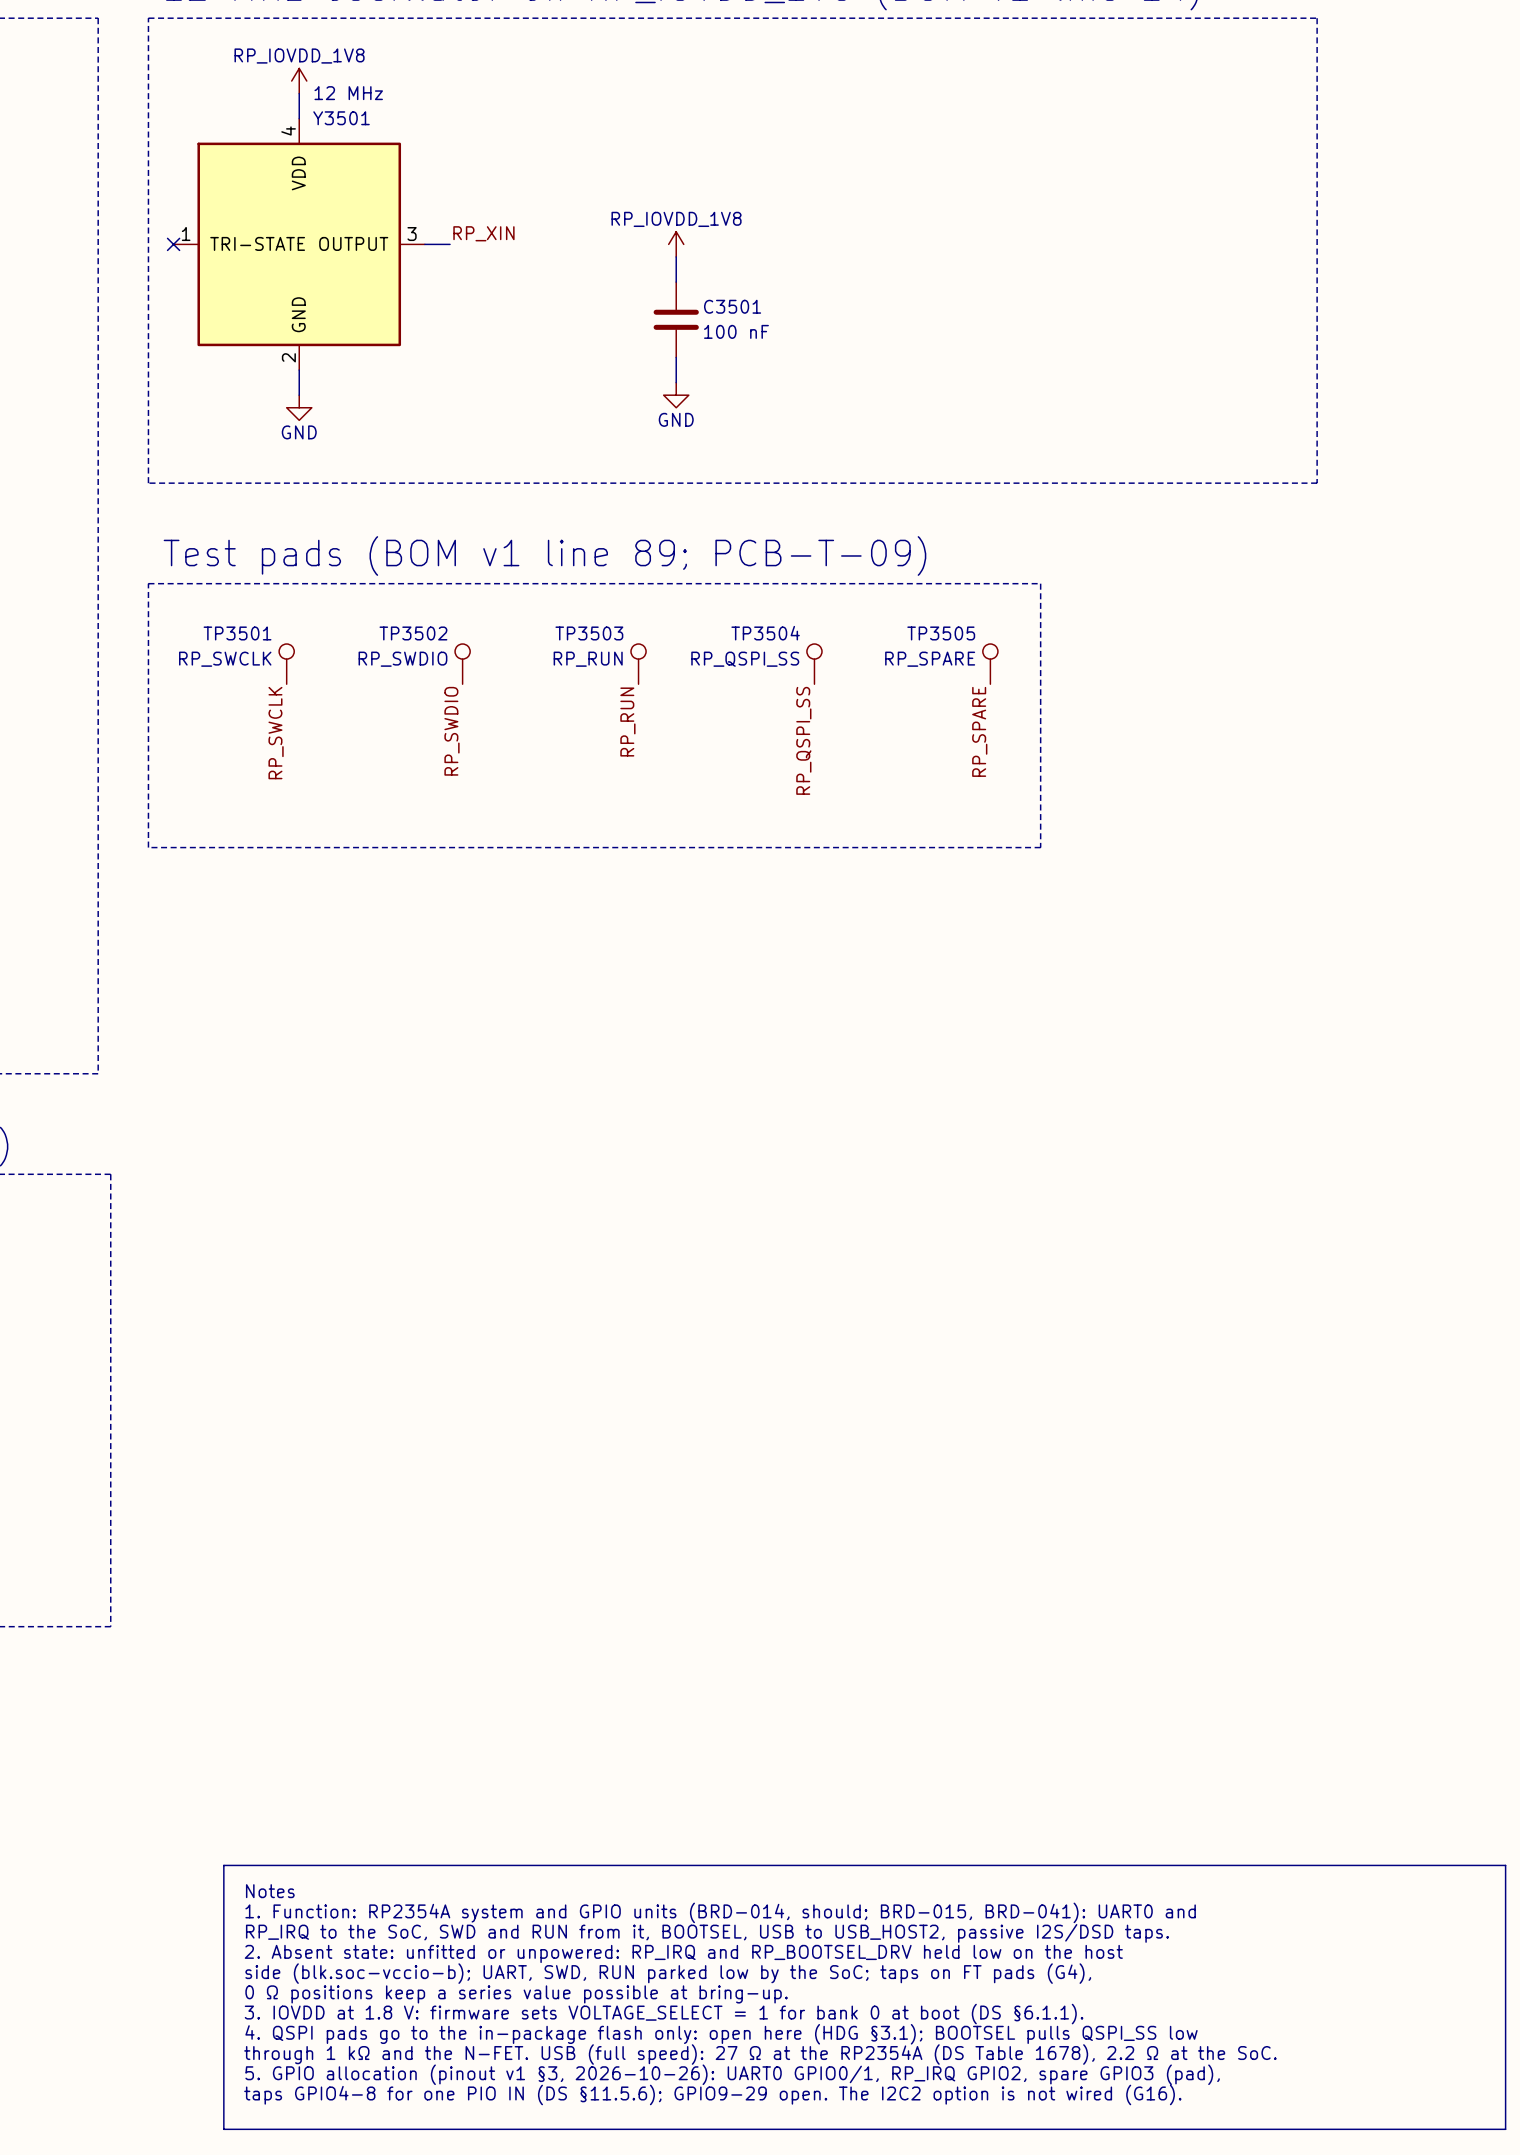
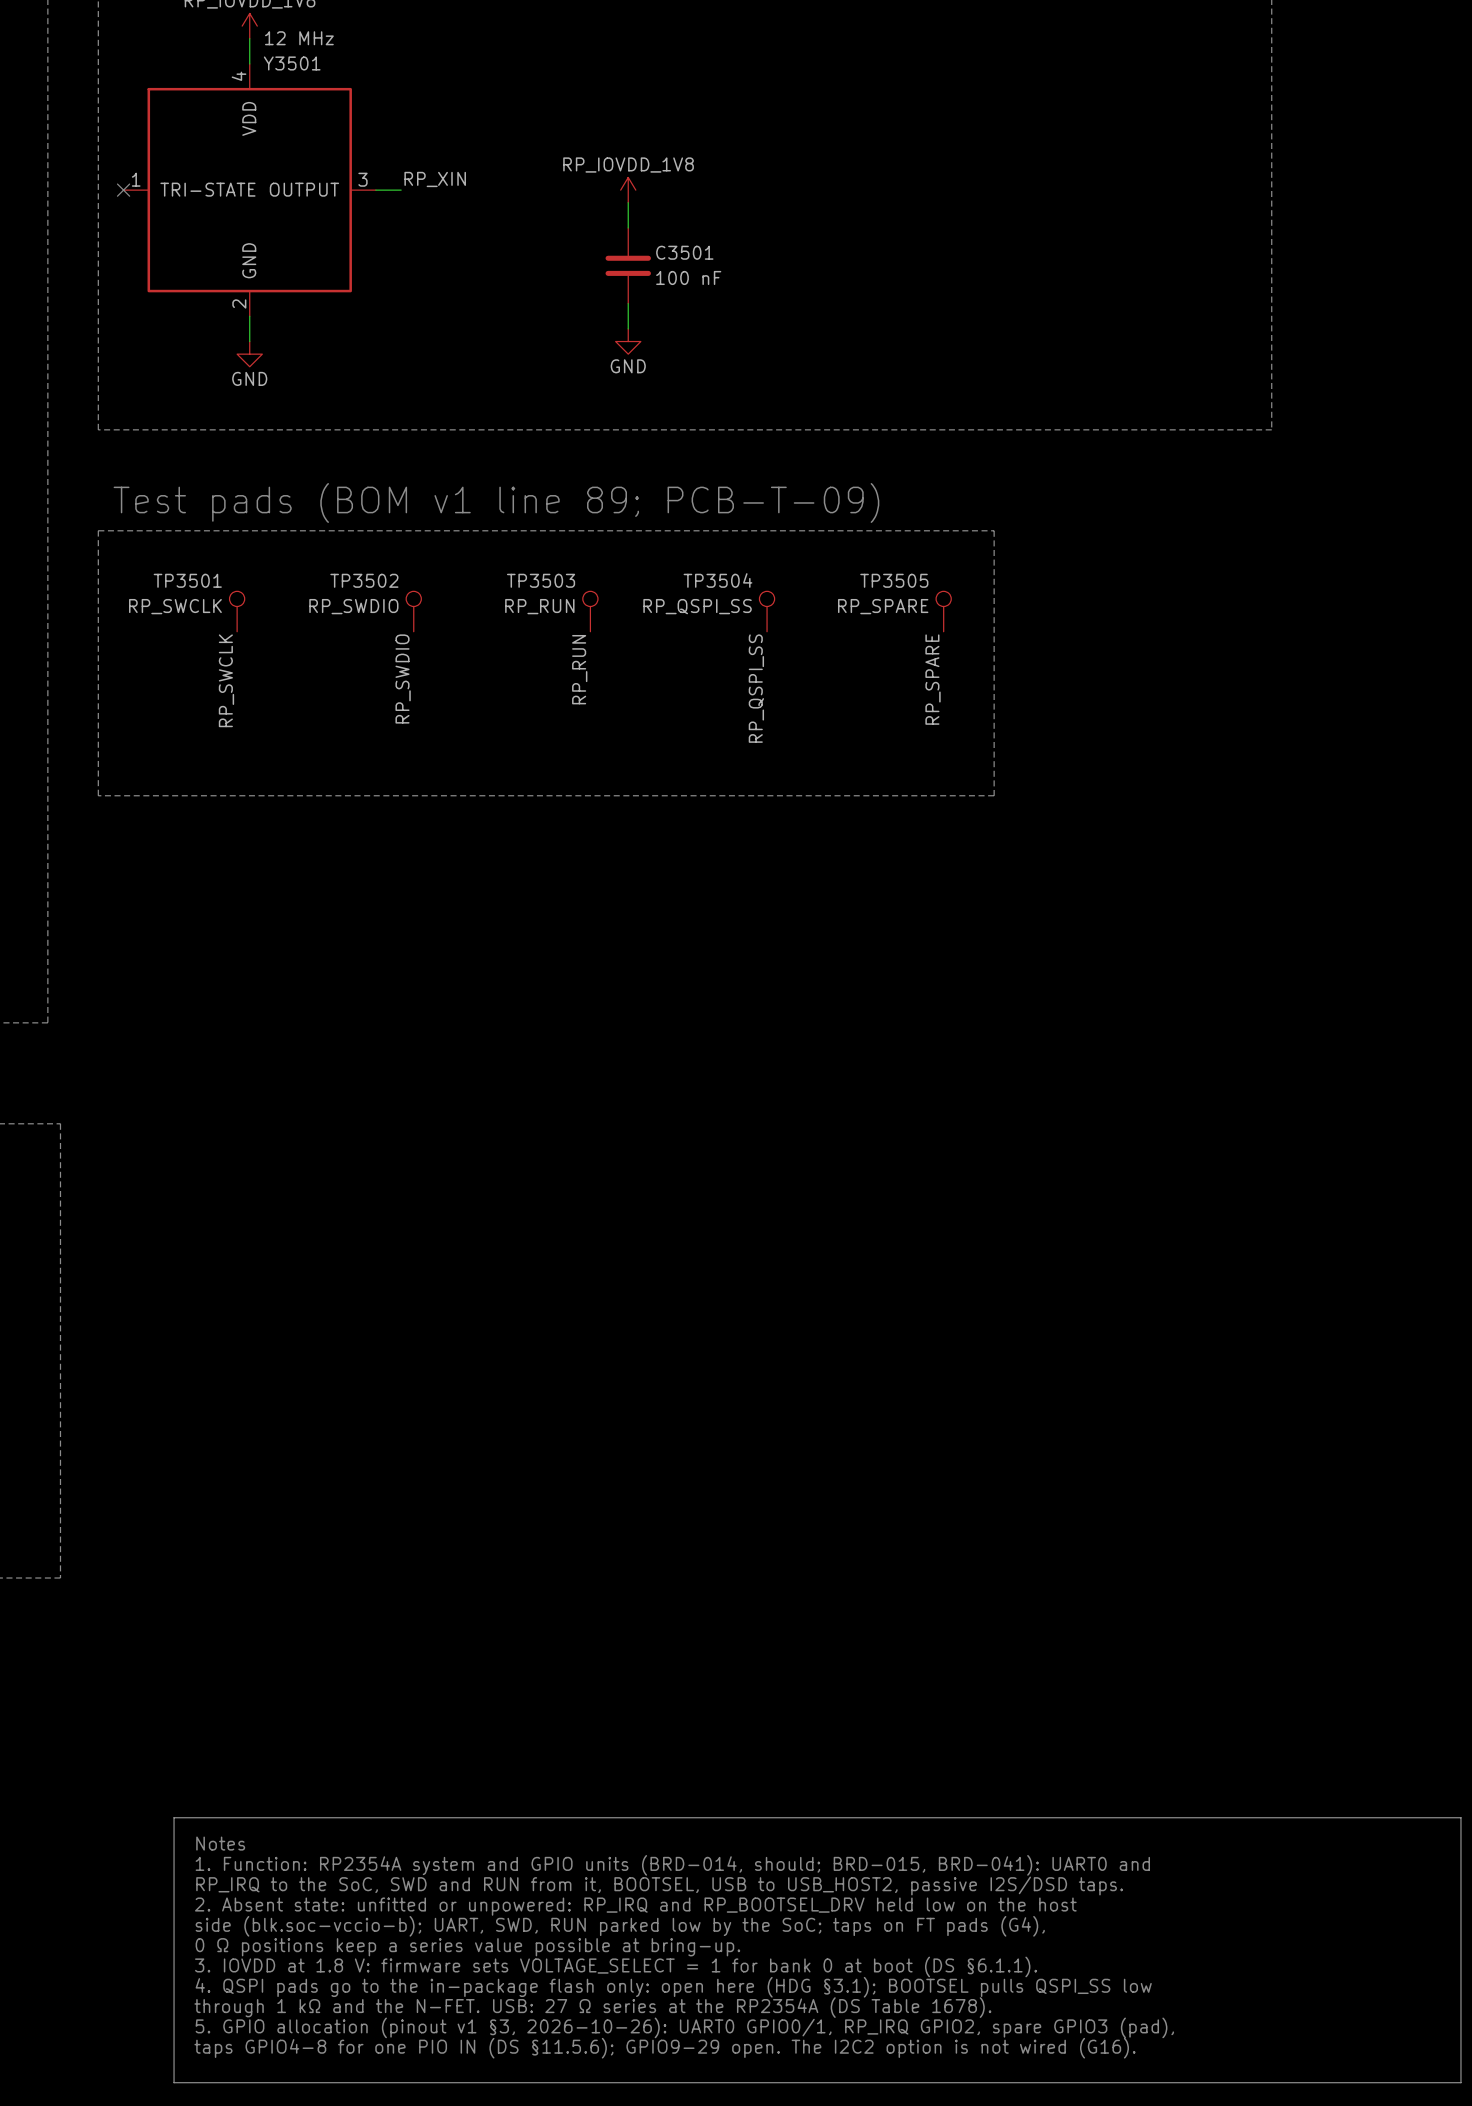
text: through 1 kΩ and the N-FET. USB (full speed): 27 Ω at the RP2354A (DS Table 1678), 2.2 Ω at the SoC. (760, 2054) -> through 1 kΩ and the N-FET. USB: 27 Ω series at the RP2354A (DS Table 1678). (592, 2007)

